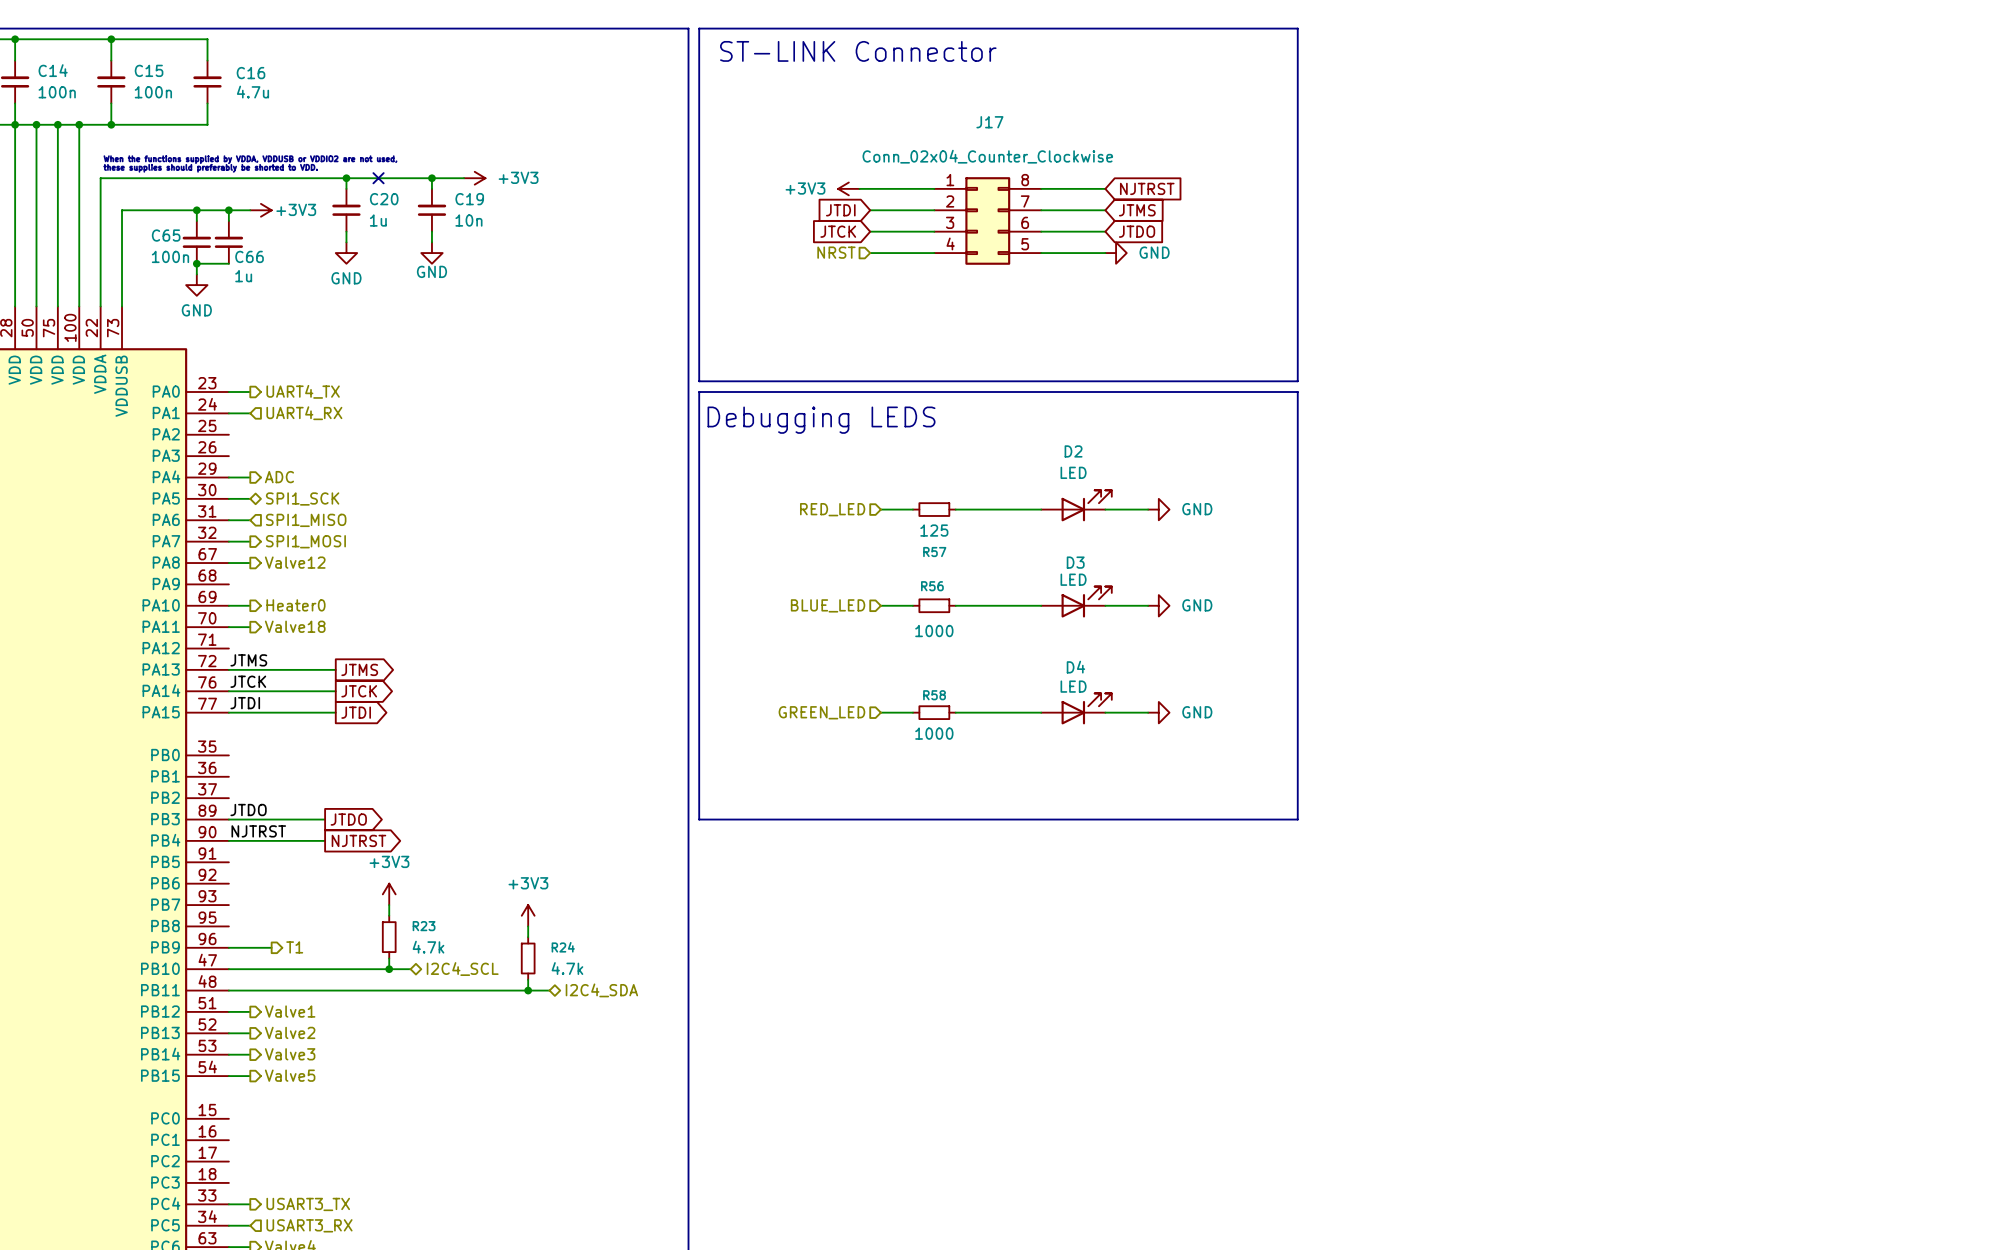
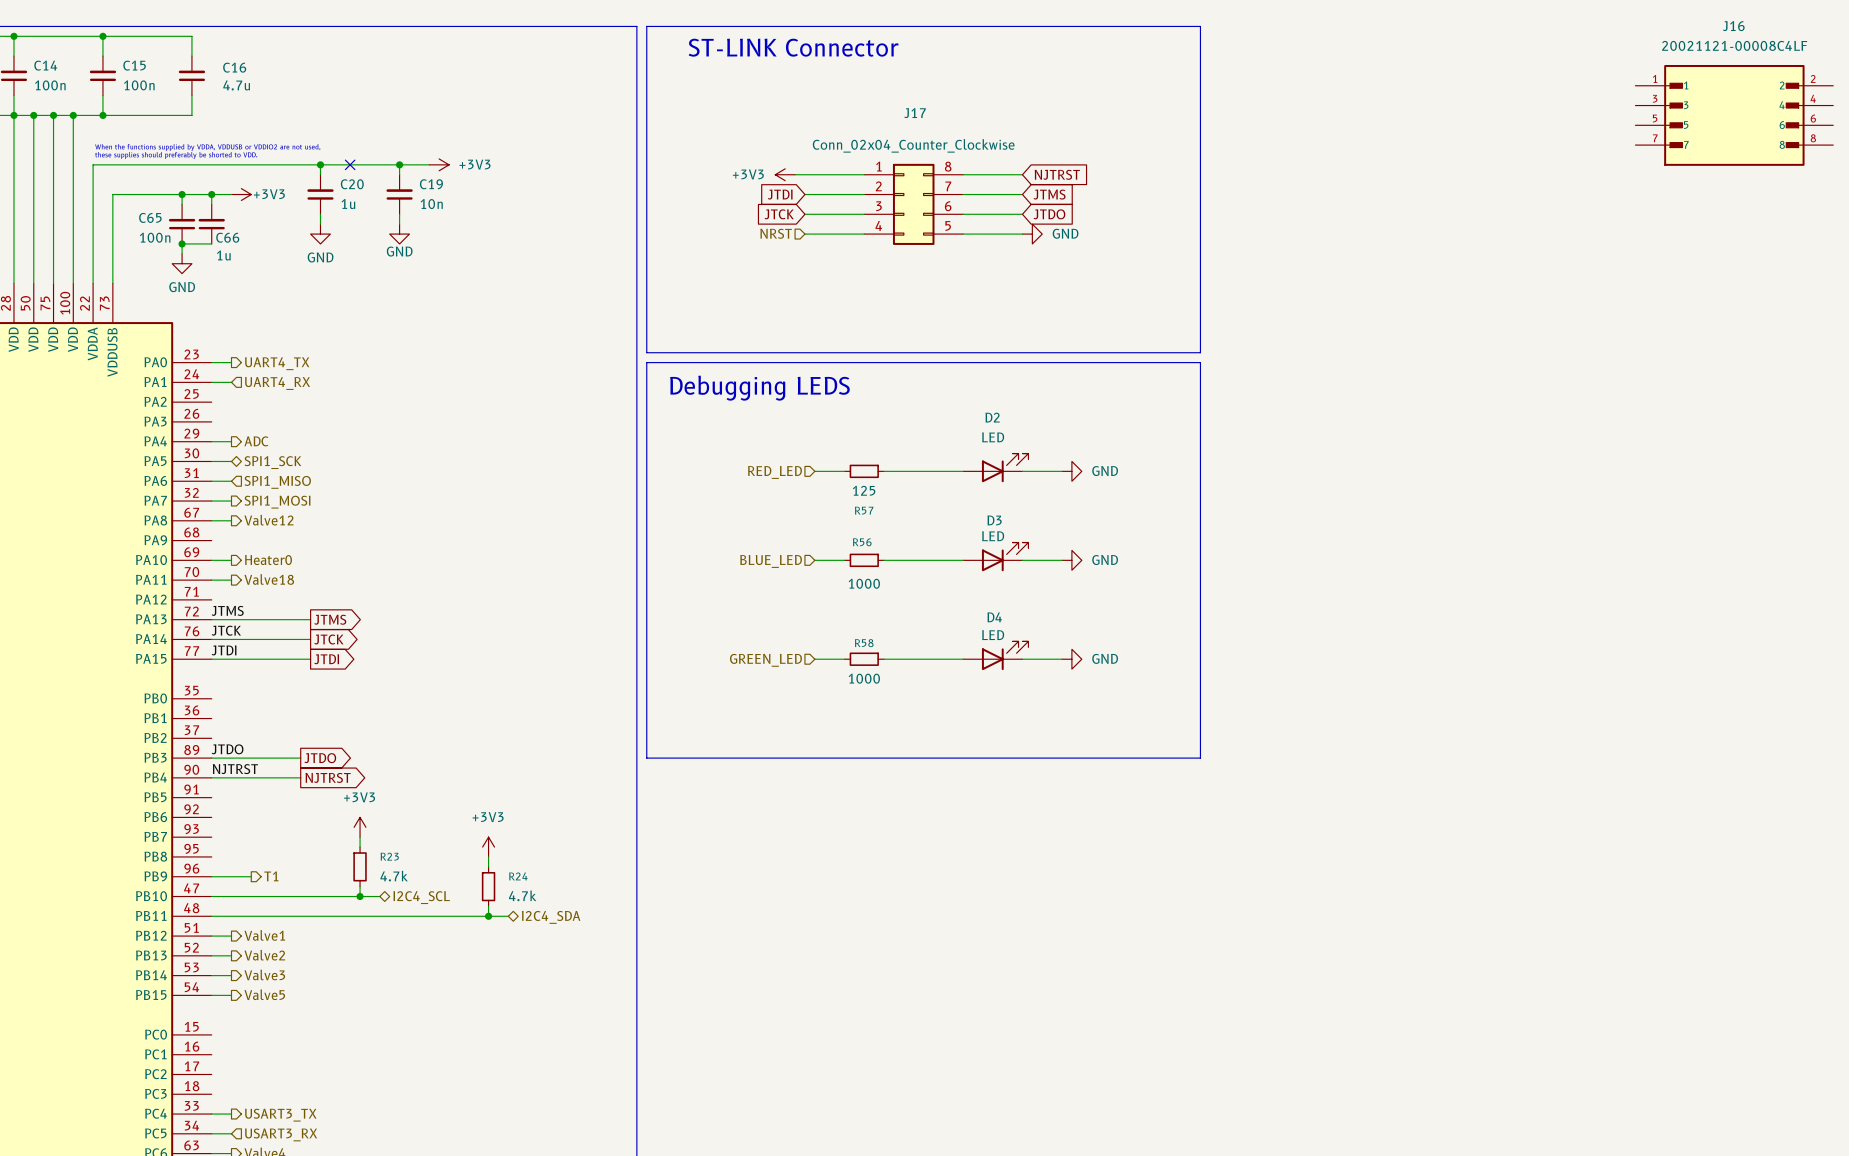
J16: none -> 20021121-00008C4LF (1734, 115)

